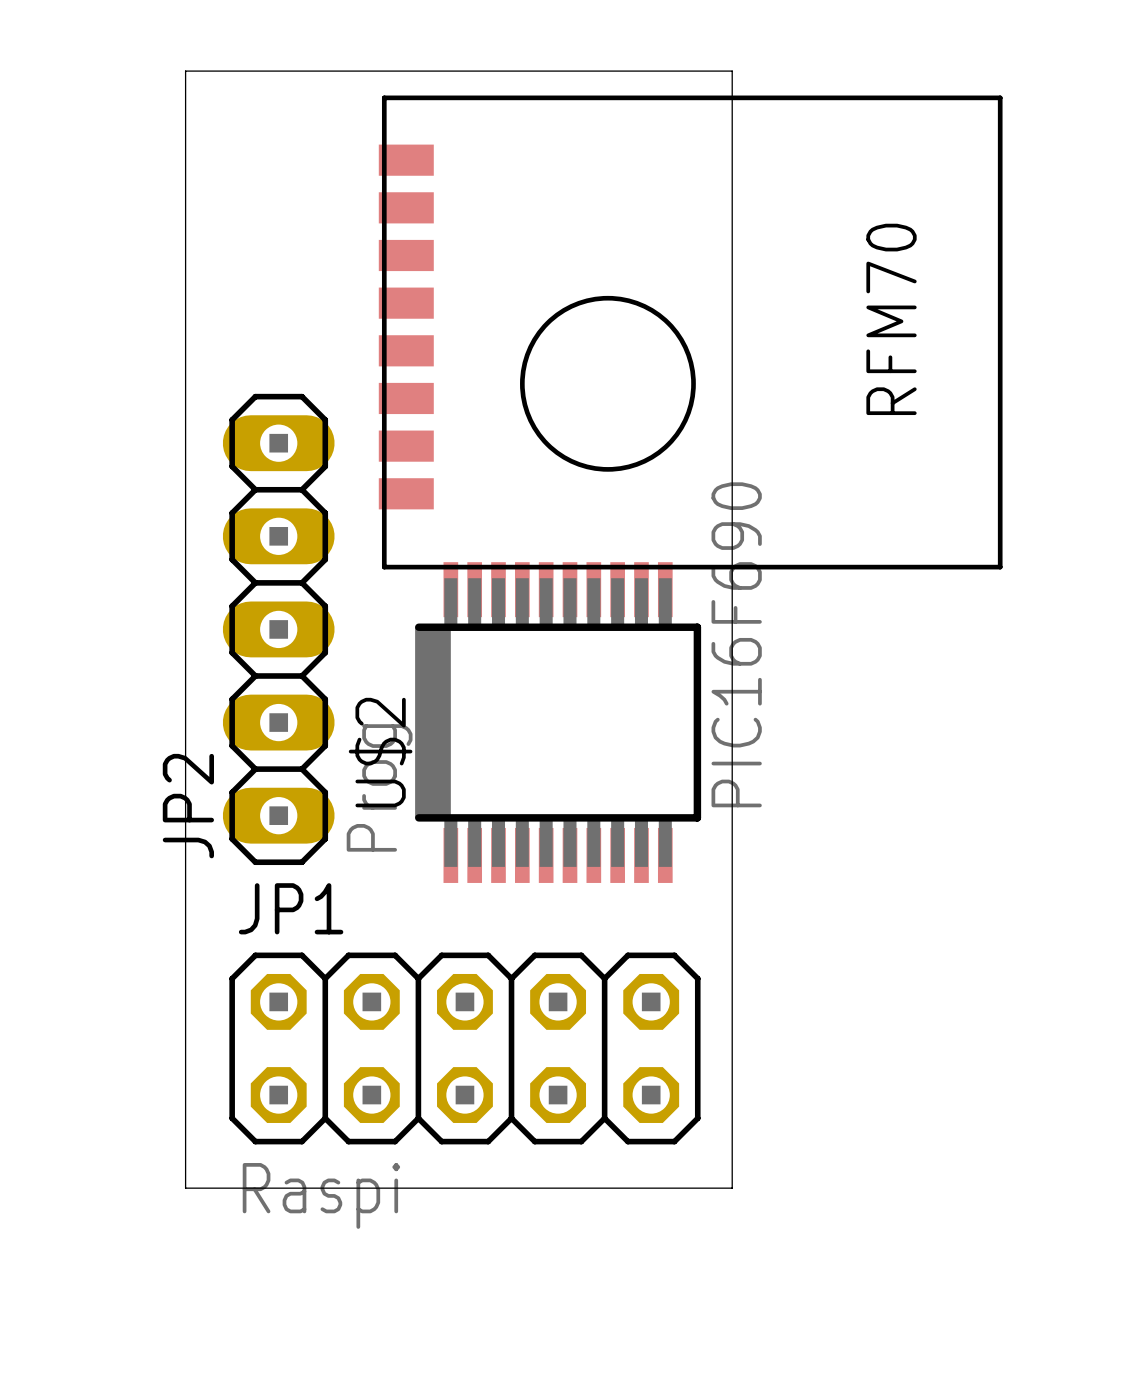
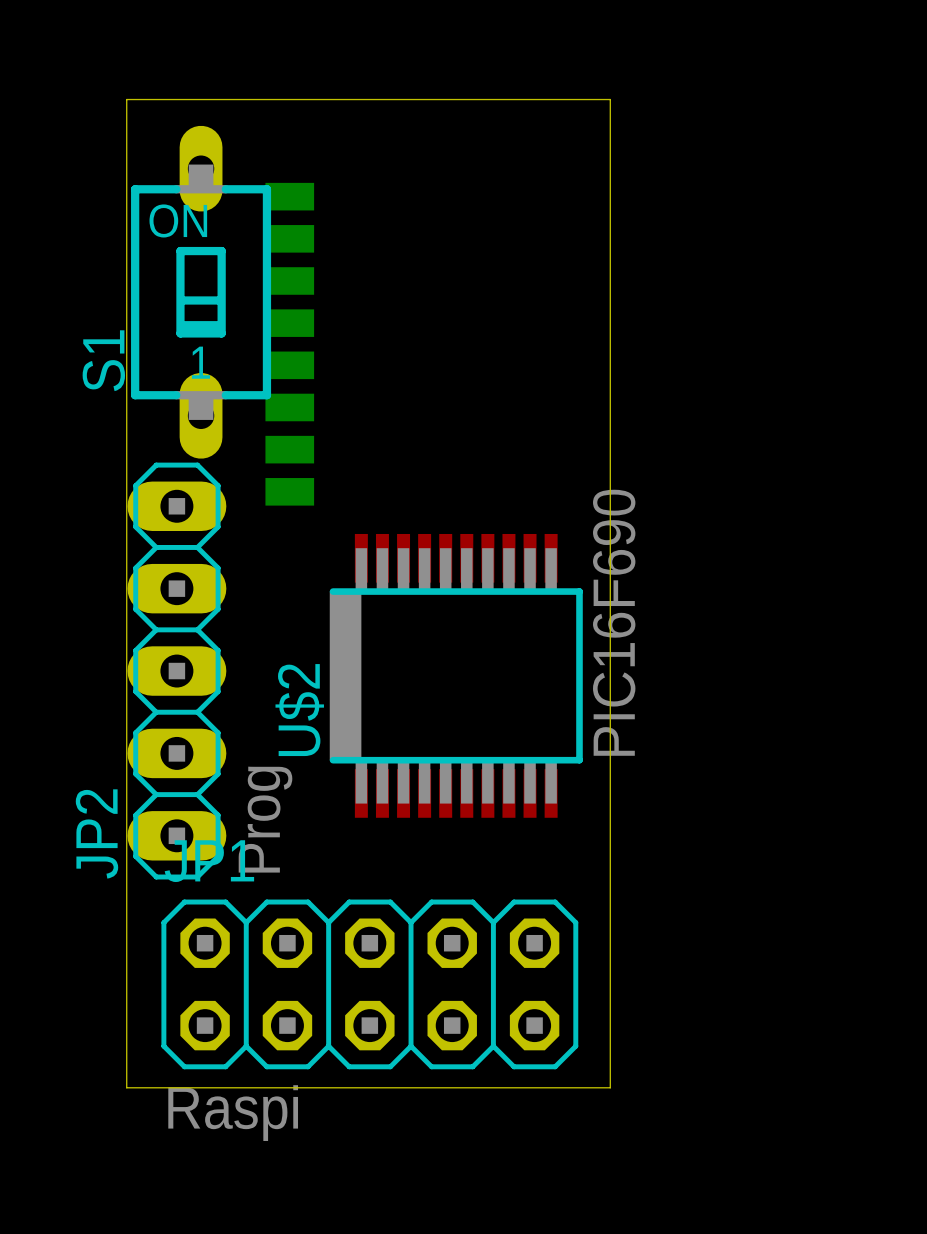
S1: none -> (201, 292)
part side: top (690, 332) -> bottom (289, 344)
JP2 position: (278, 629) -> (176, 671)
JP1 position: (464, 1048) -> (369, 984)

